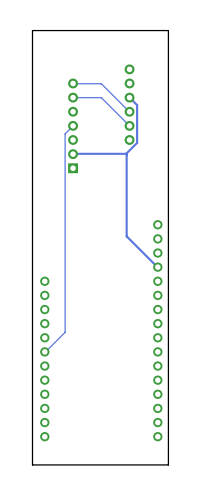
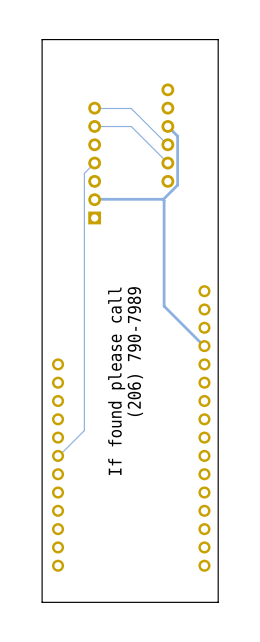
text: none -> (206) 790-7989 (135, 351)
text: none -> If found please call (116, 381)

